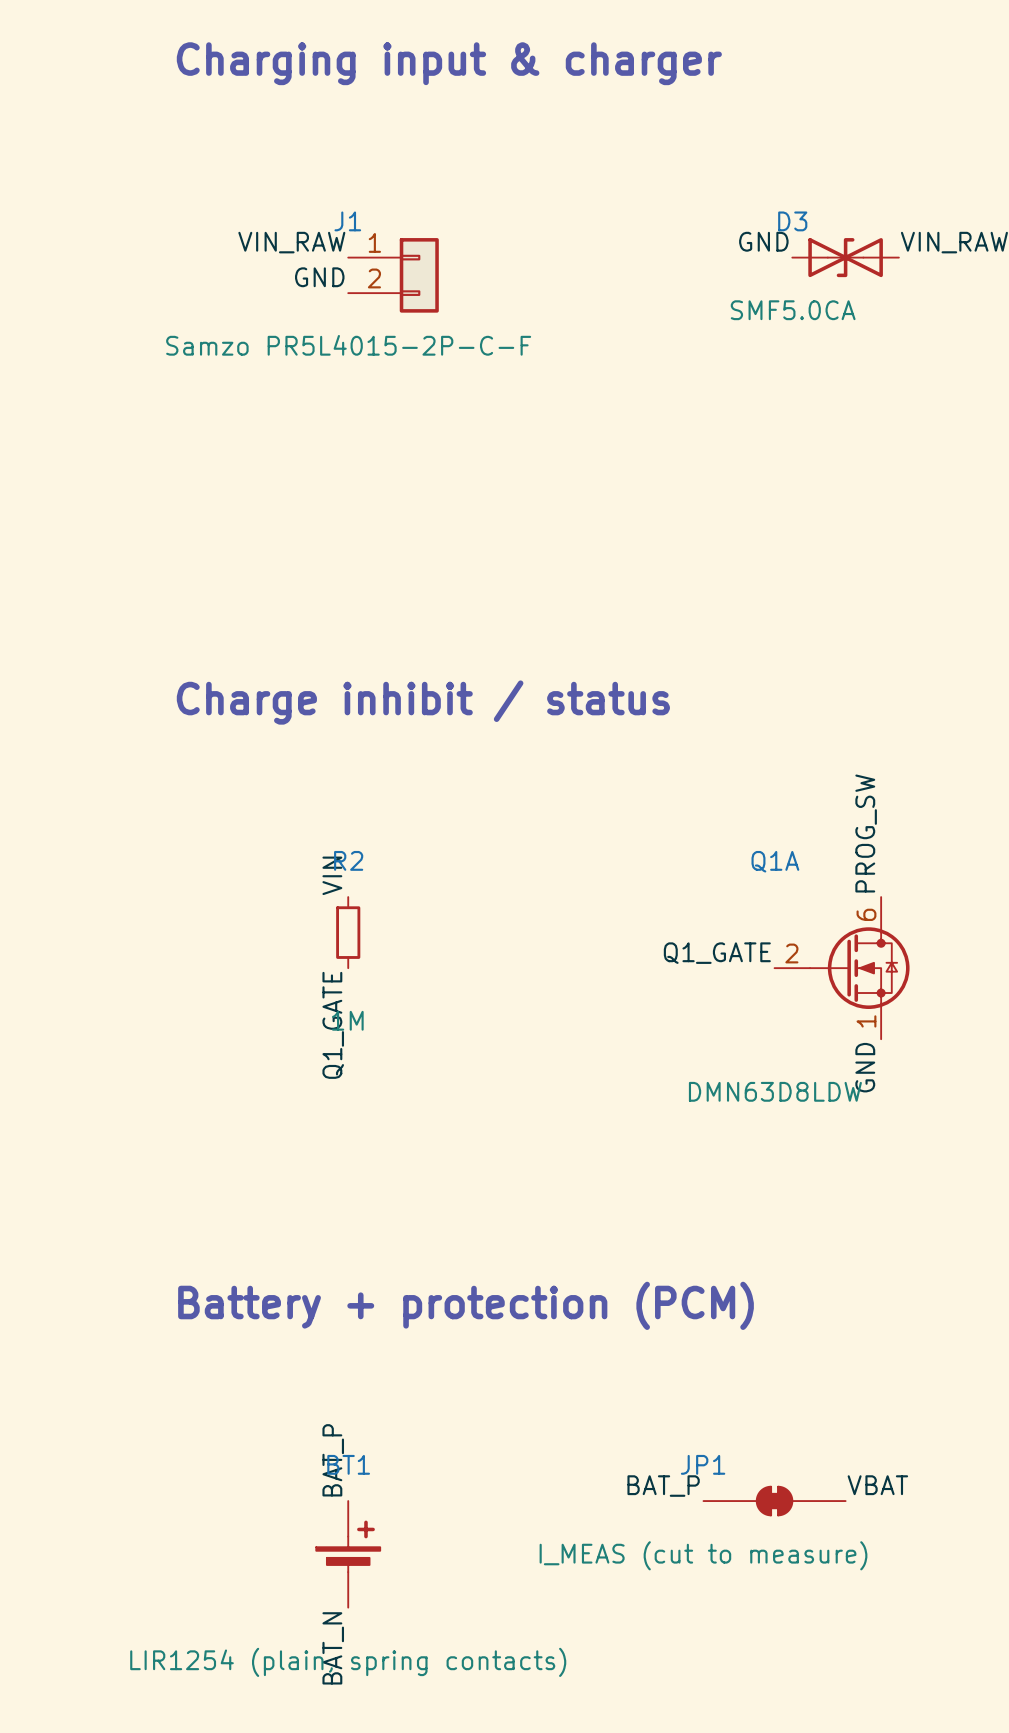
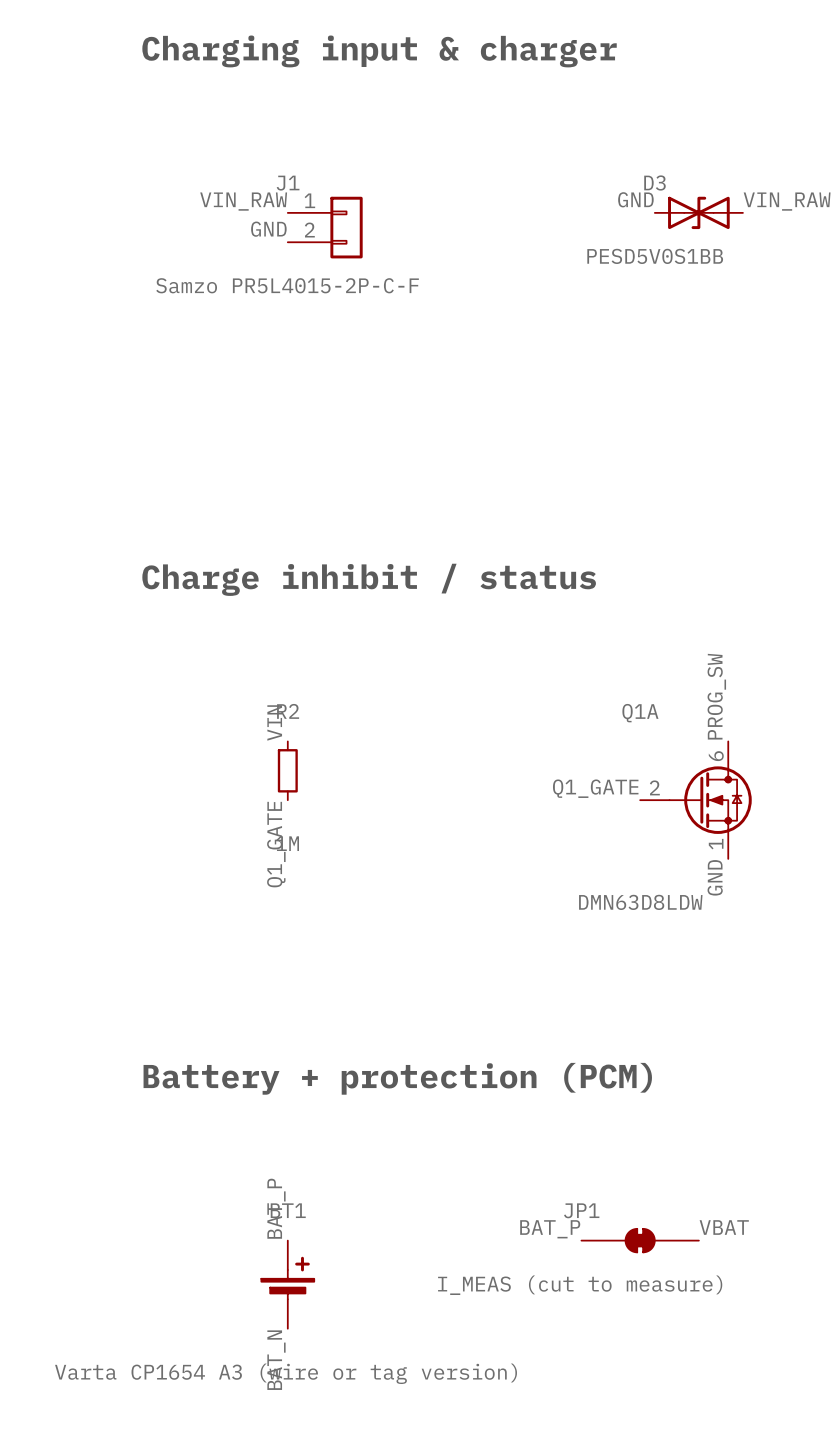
D3 value: SMF5.0CA (793, 310) -> PESD5V0S1BB (655, 256)
BT1 value: LIR1254 (plain, spring contacts) (348, 1662) -> Varta CP1654 A3 (wire or tag version) (286, 1373)

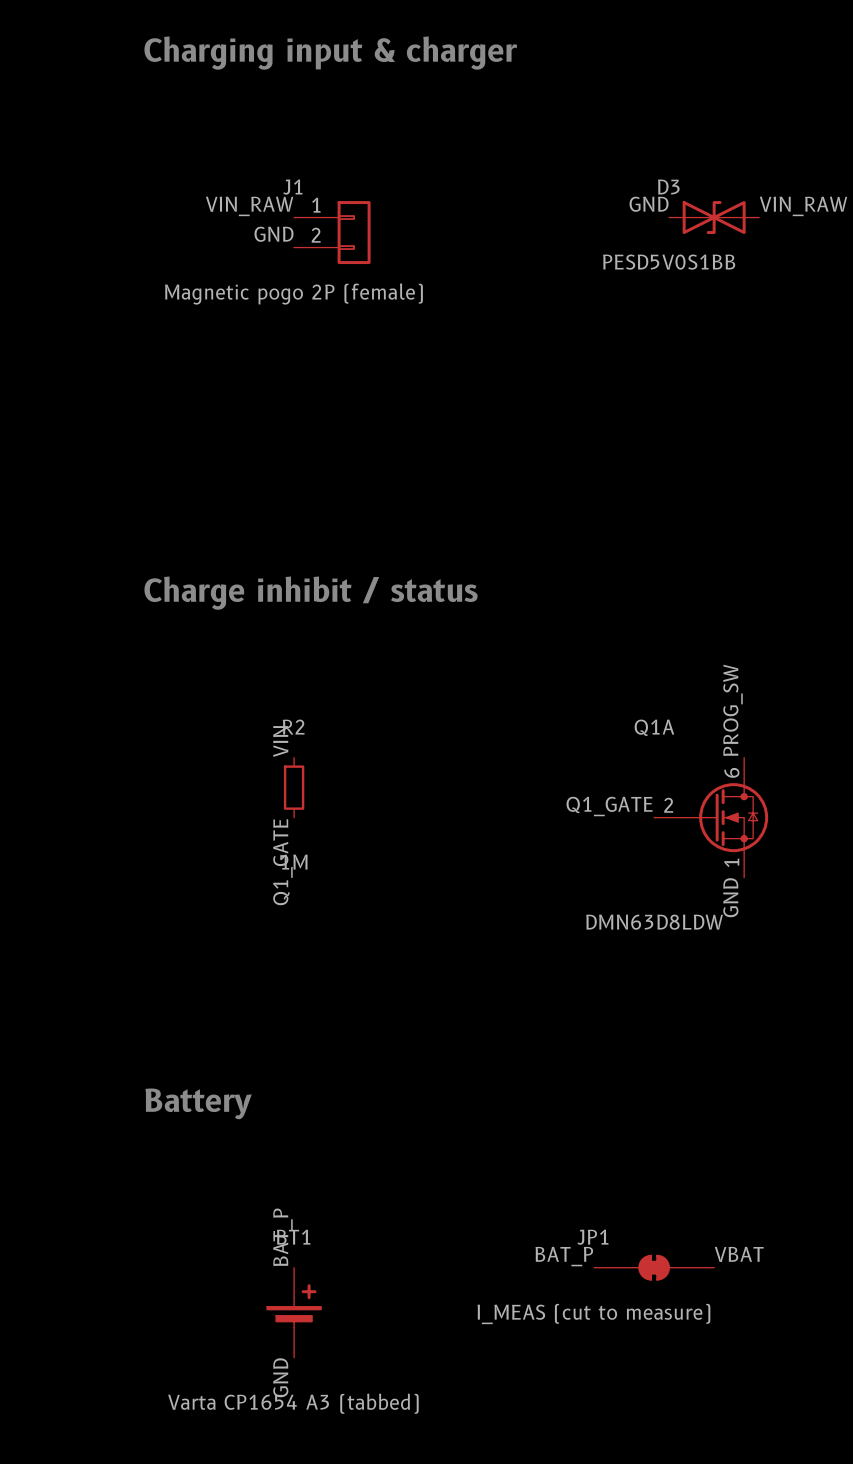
J1 value: Samzo PR5L4015-2P-C-F (287, 285) -> Magnetic pogo 2P (female) (293, 294)
text: Battery + protection (PCM) (397, 1078) -> Battery (198, 1103)
label: BAT_N (276, 1360) -> GND (280, 1377)
BT1 value: Varta CP1654 A3 (wire or tag version) (286, 1373) -> Varta CP1654 A3 (tabbed) (293, 1403)

